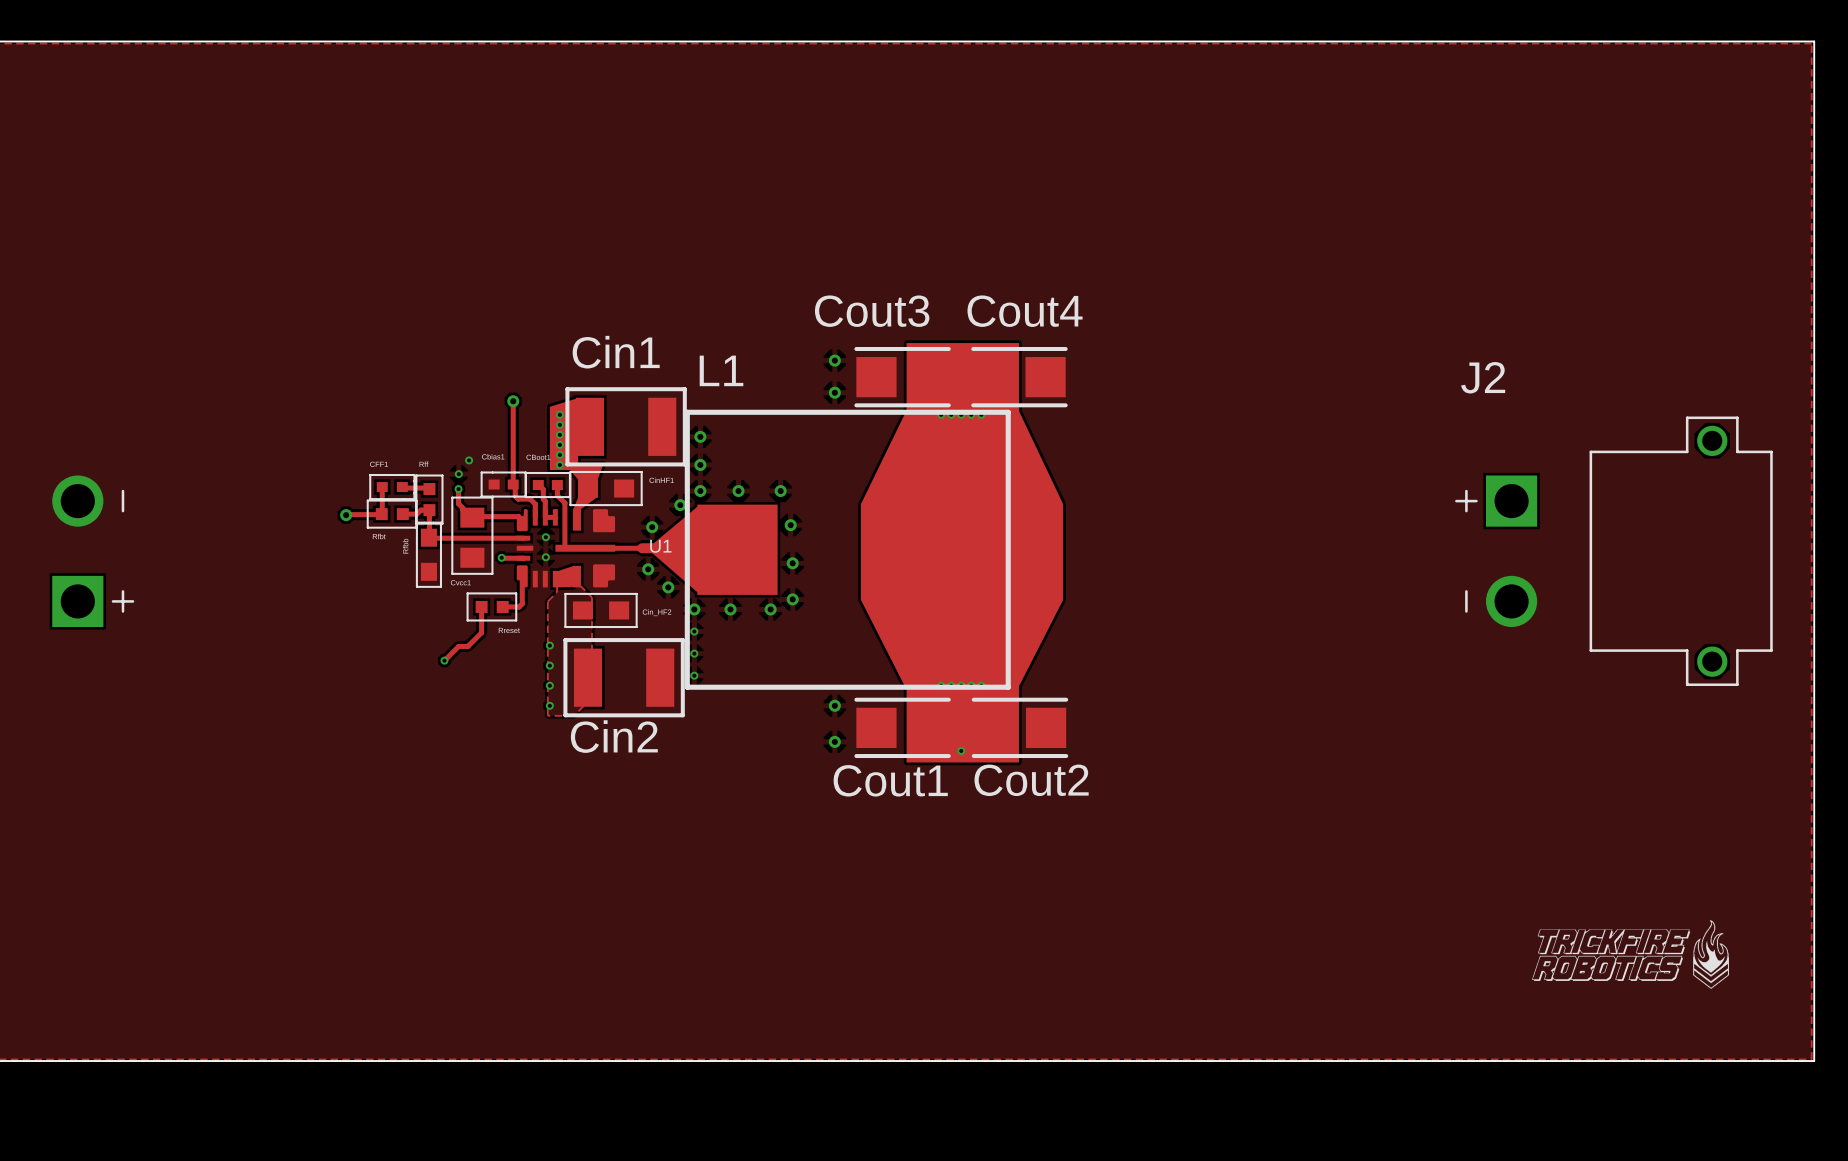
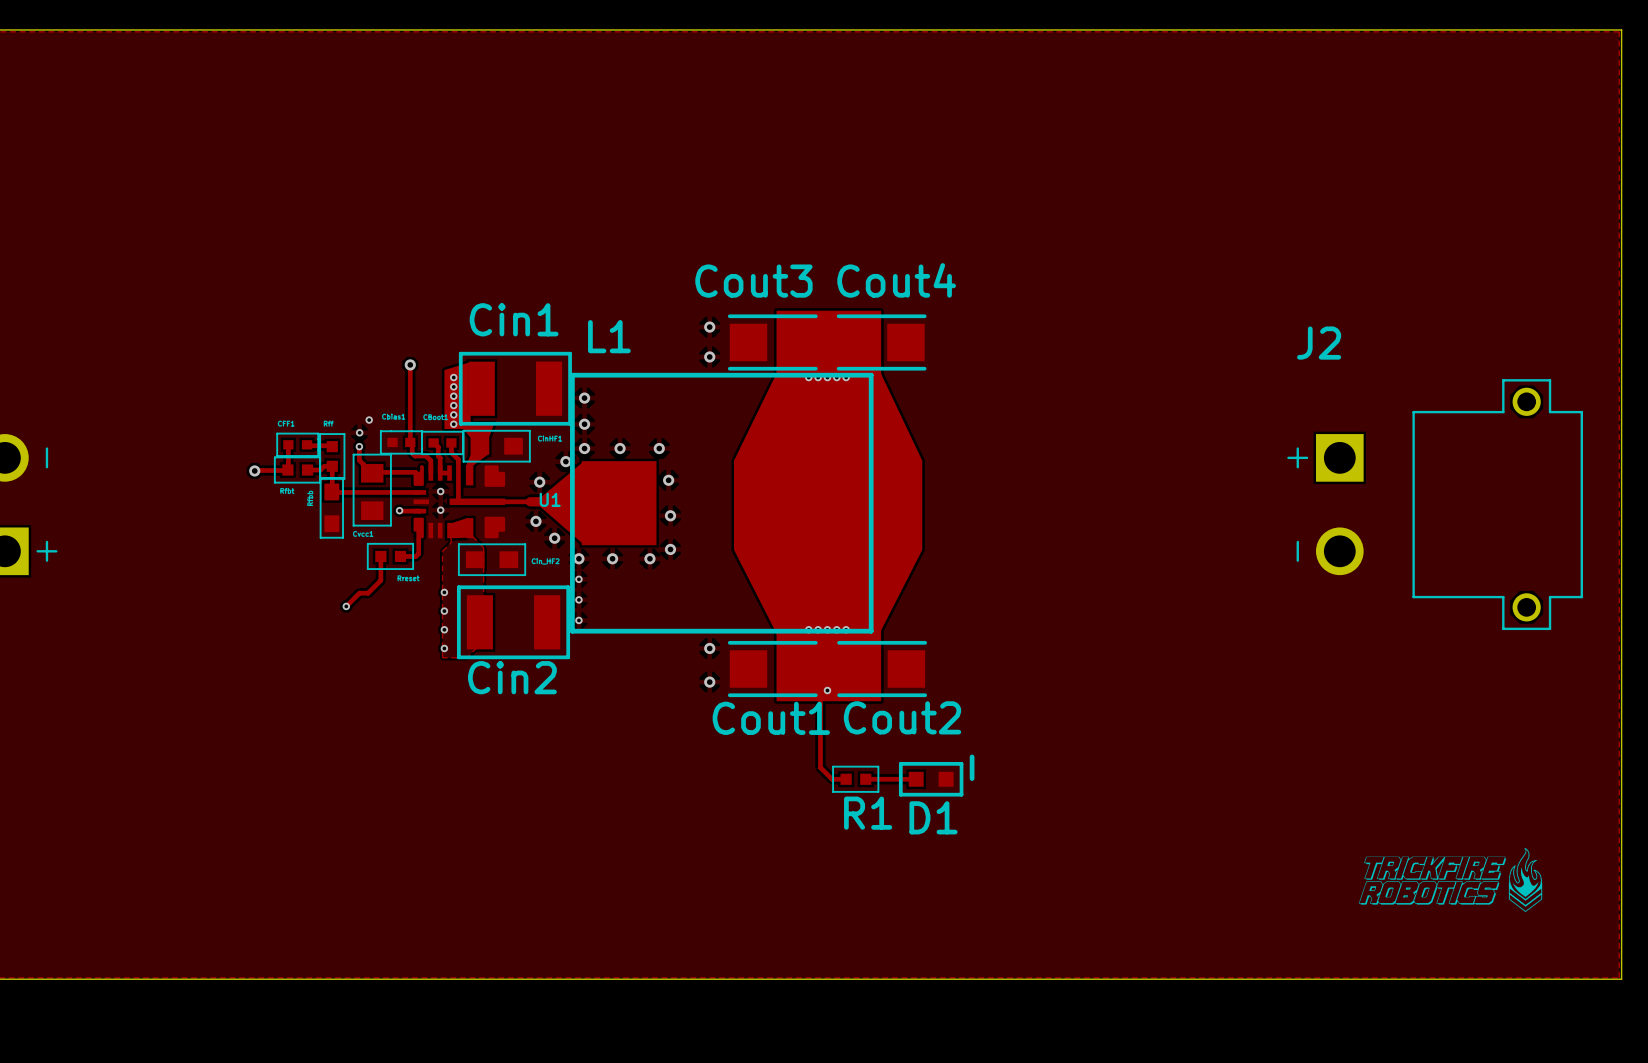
track: none -> (799, 690) (812, 690) (820, 698) (820, 767) (832, 779) (846, 779)
R1: none -> (855, 779)
track: none -> (865, 779) (916, 779)
D1: none -> (931, 779)

